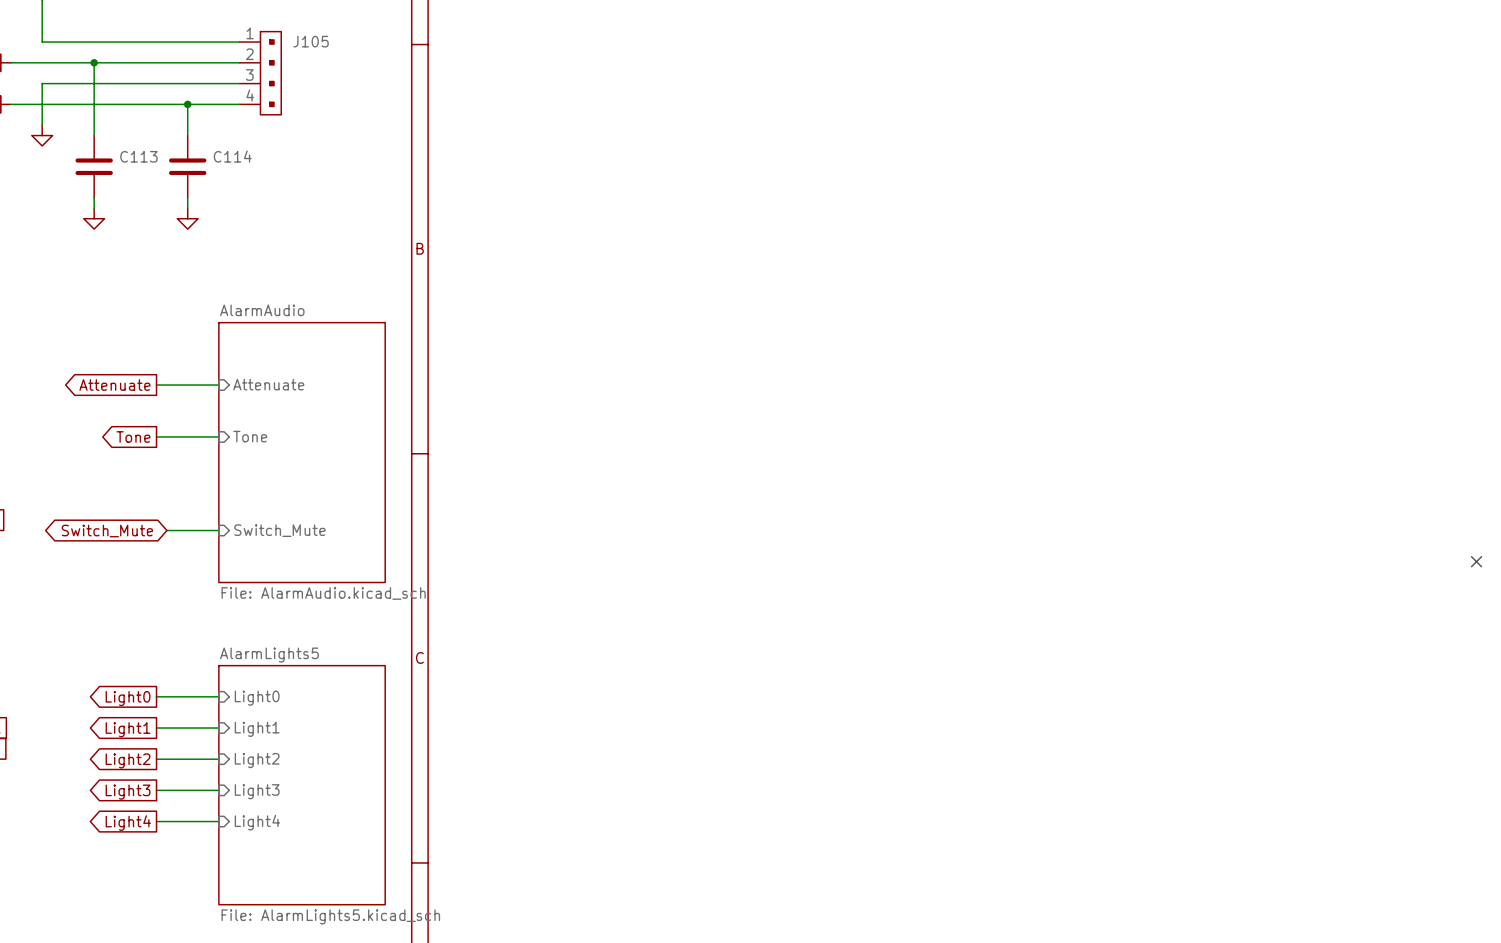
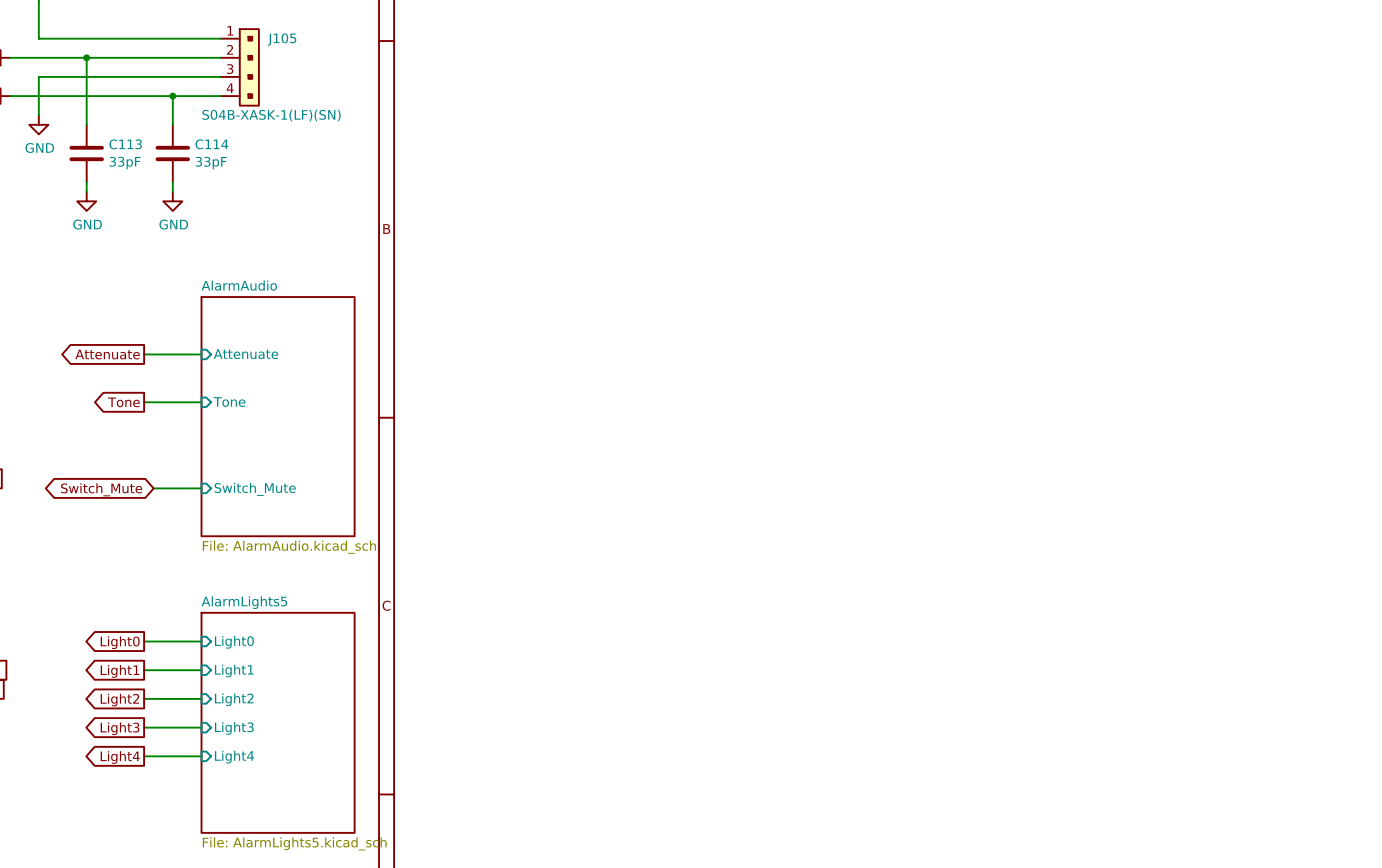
J105 value: none -> S04B-XASK-1(LF)(SN) (271, 115)
power symbol text: none -> GND (39, 147)
C113 value: none -> 33pF (125, 163)
C114 value: none -> 33pF (211, 163)
power symbol text: none -> GND (87, 224)
power symbol text: none -> GND (173, 224)
no-connect mark: (1476, 561) -> none

